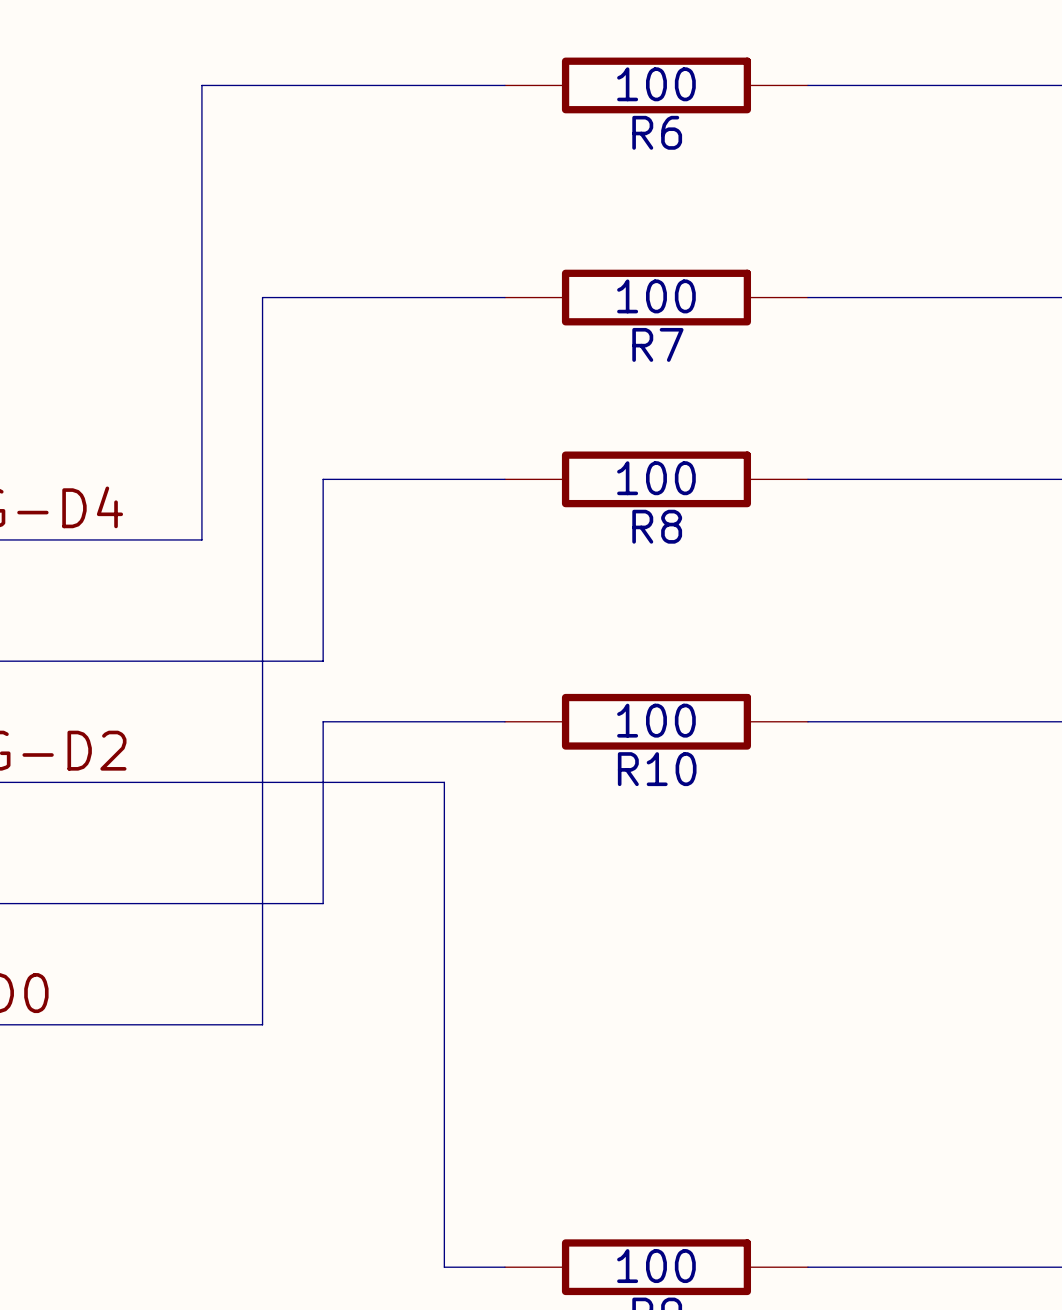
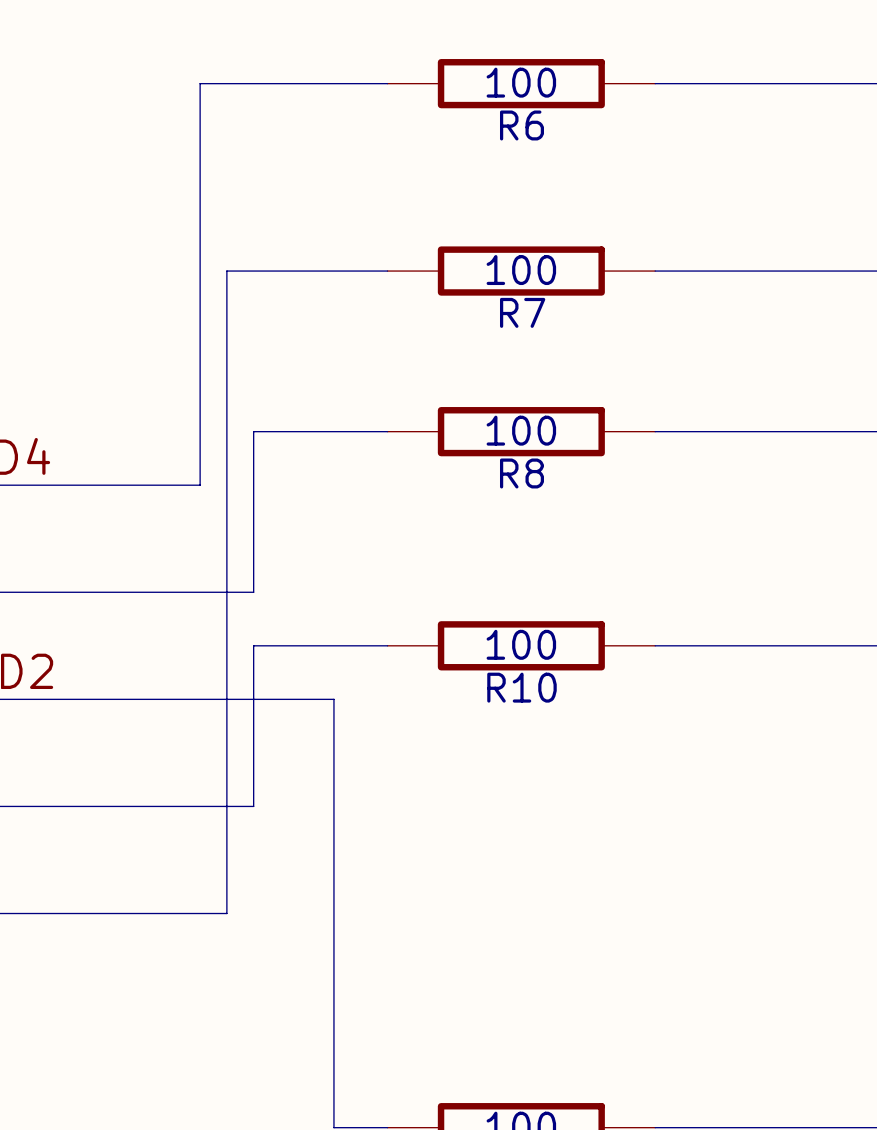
wire: (292, 85) (201, 85) (201, 539) -> (200, 83) (200, 485) (119, 485)
wire: (323, 297) (262, 297) (262, 1024) -> (253, 645) (253, 806) (226, 806) (226, 913) (173, 913)
wire: (323, 479) (353, 479) -> (226, 431) (226, 271)
wire: (323, 721) (353, 721) -> (226, 645) (226, 592) (253, 592) (253, 431)

